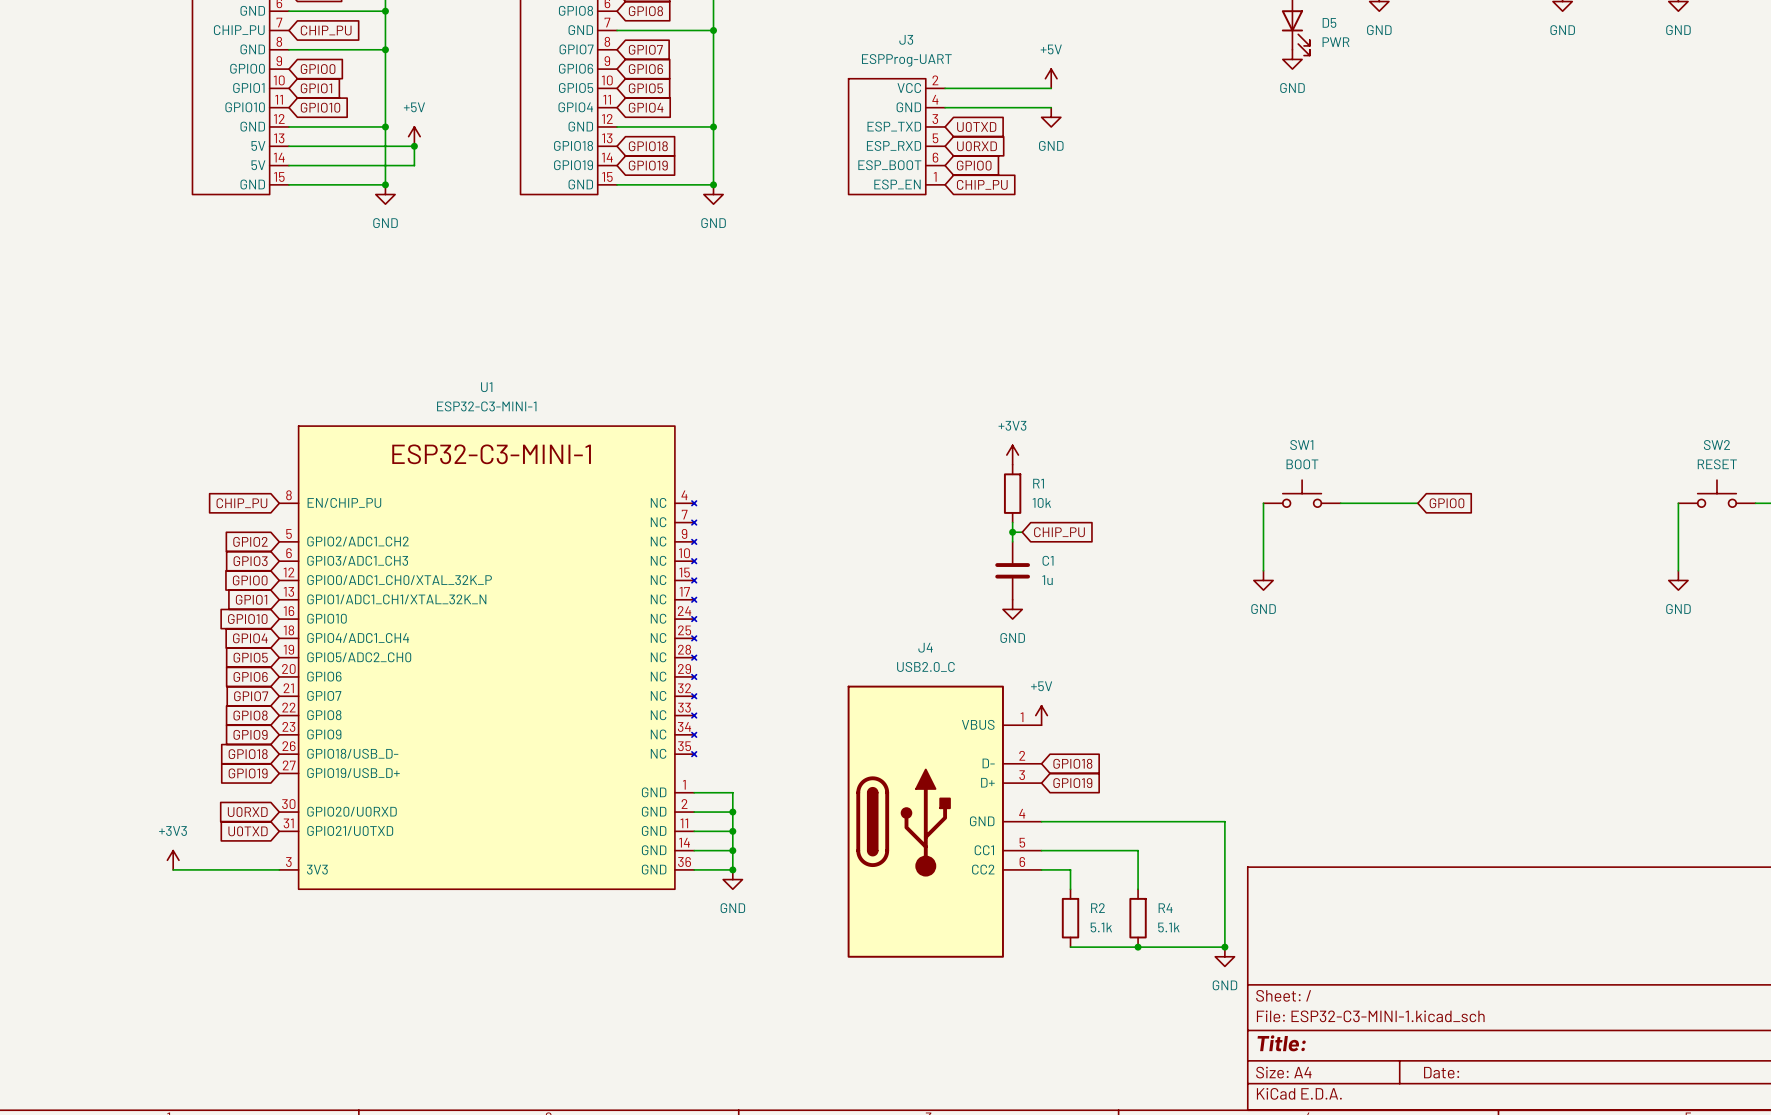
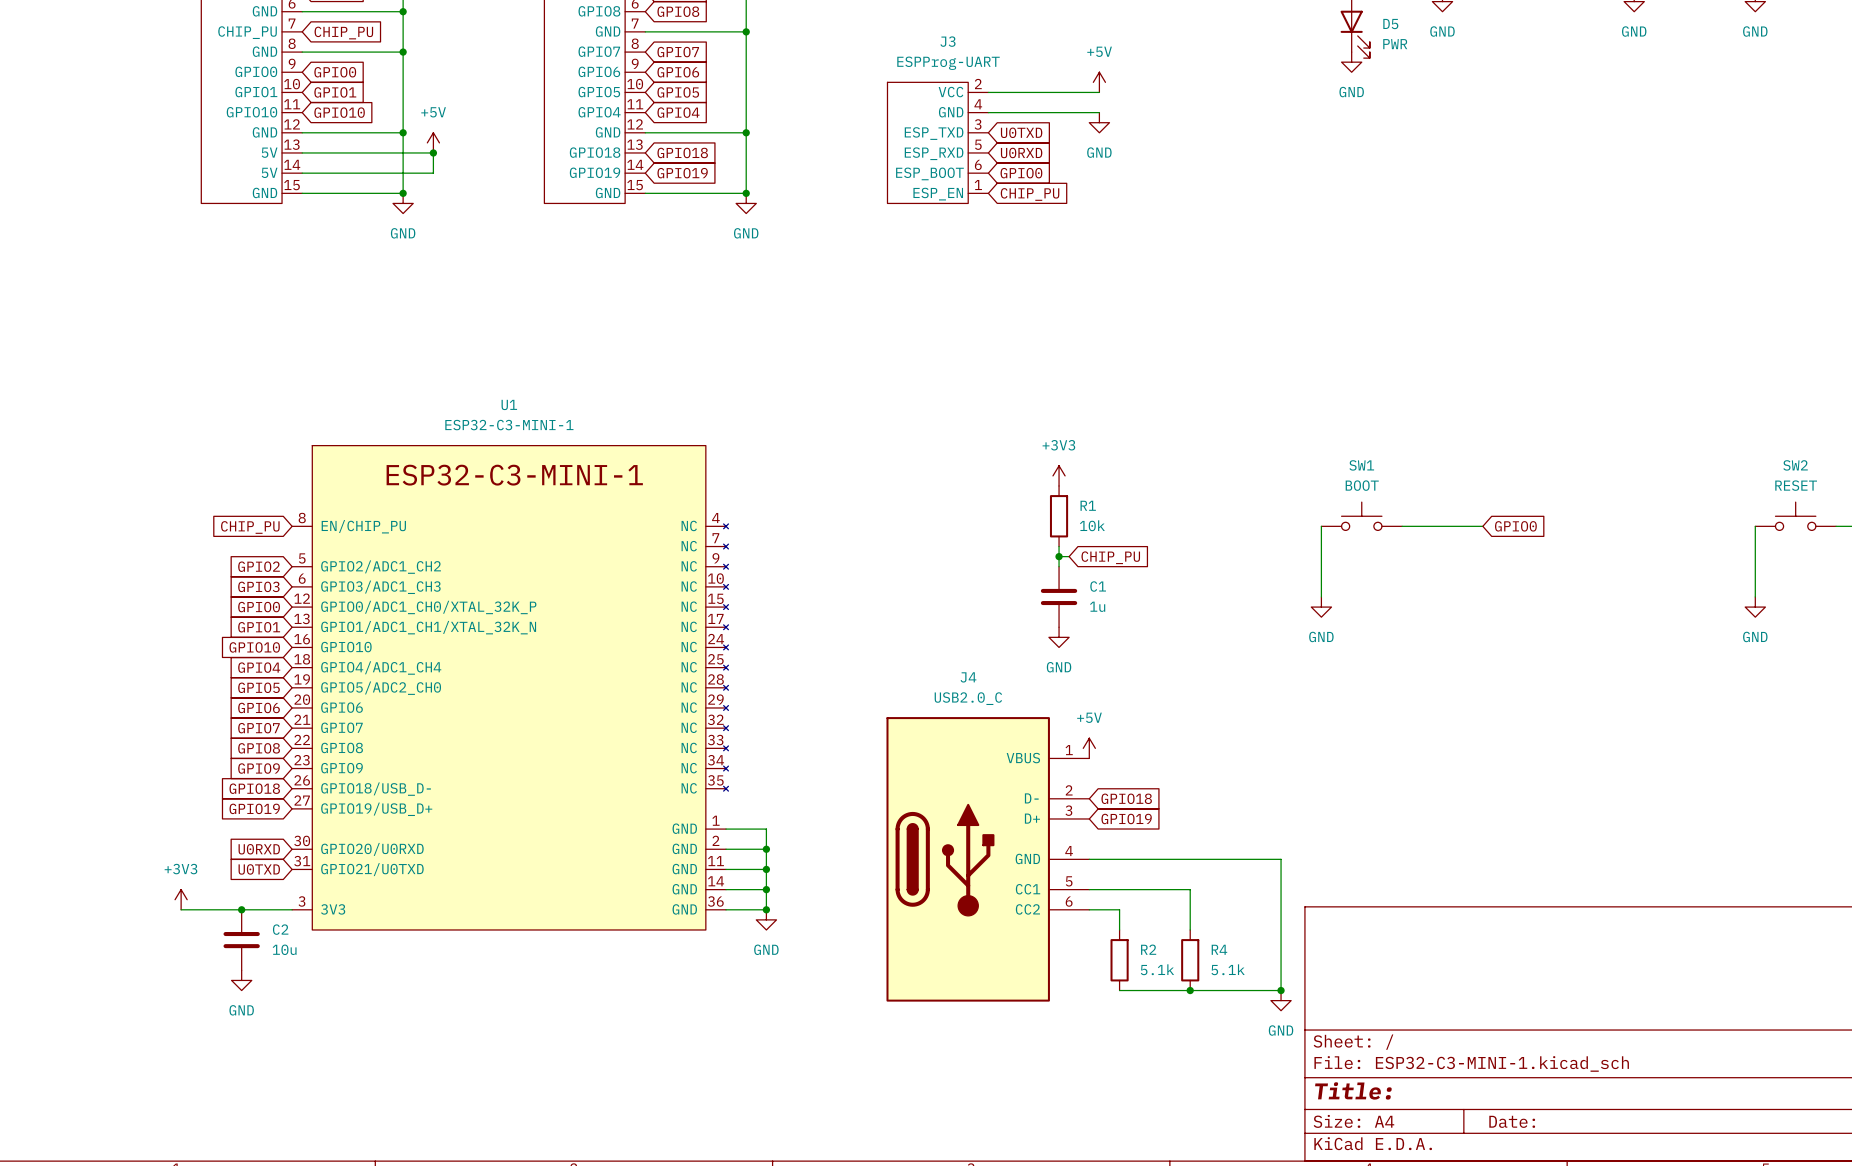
junction: none -> (241, 909)
C2: none -> 10u (241, 940)
power symbol: none -> GND (241, 980)

